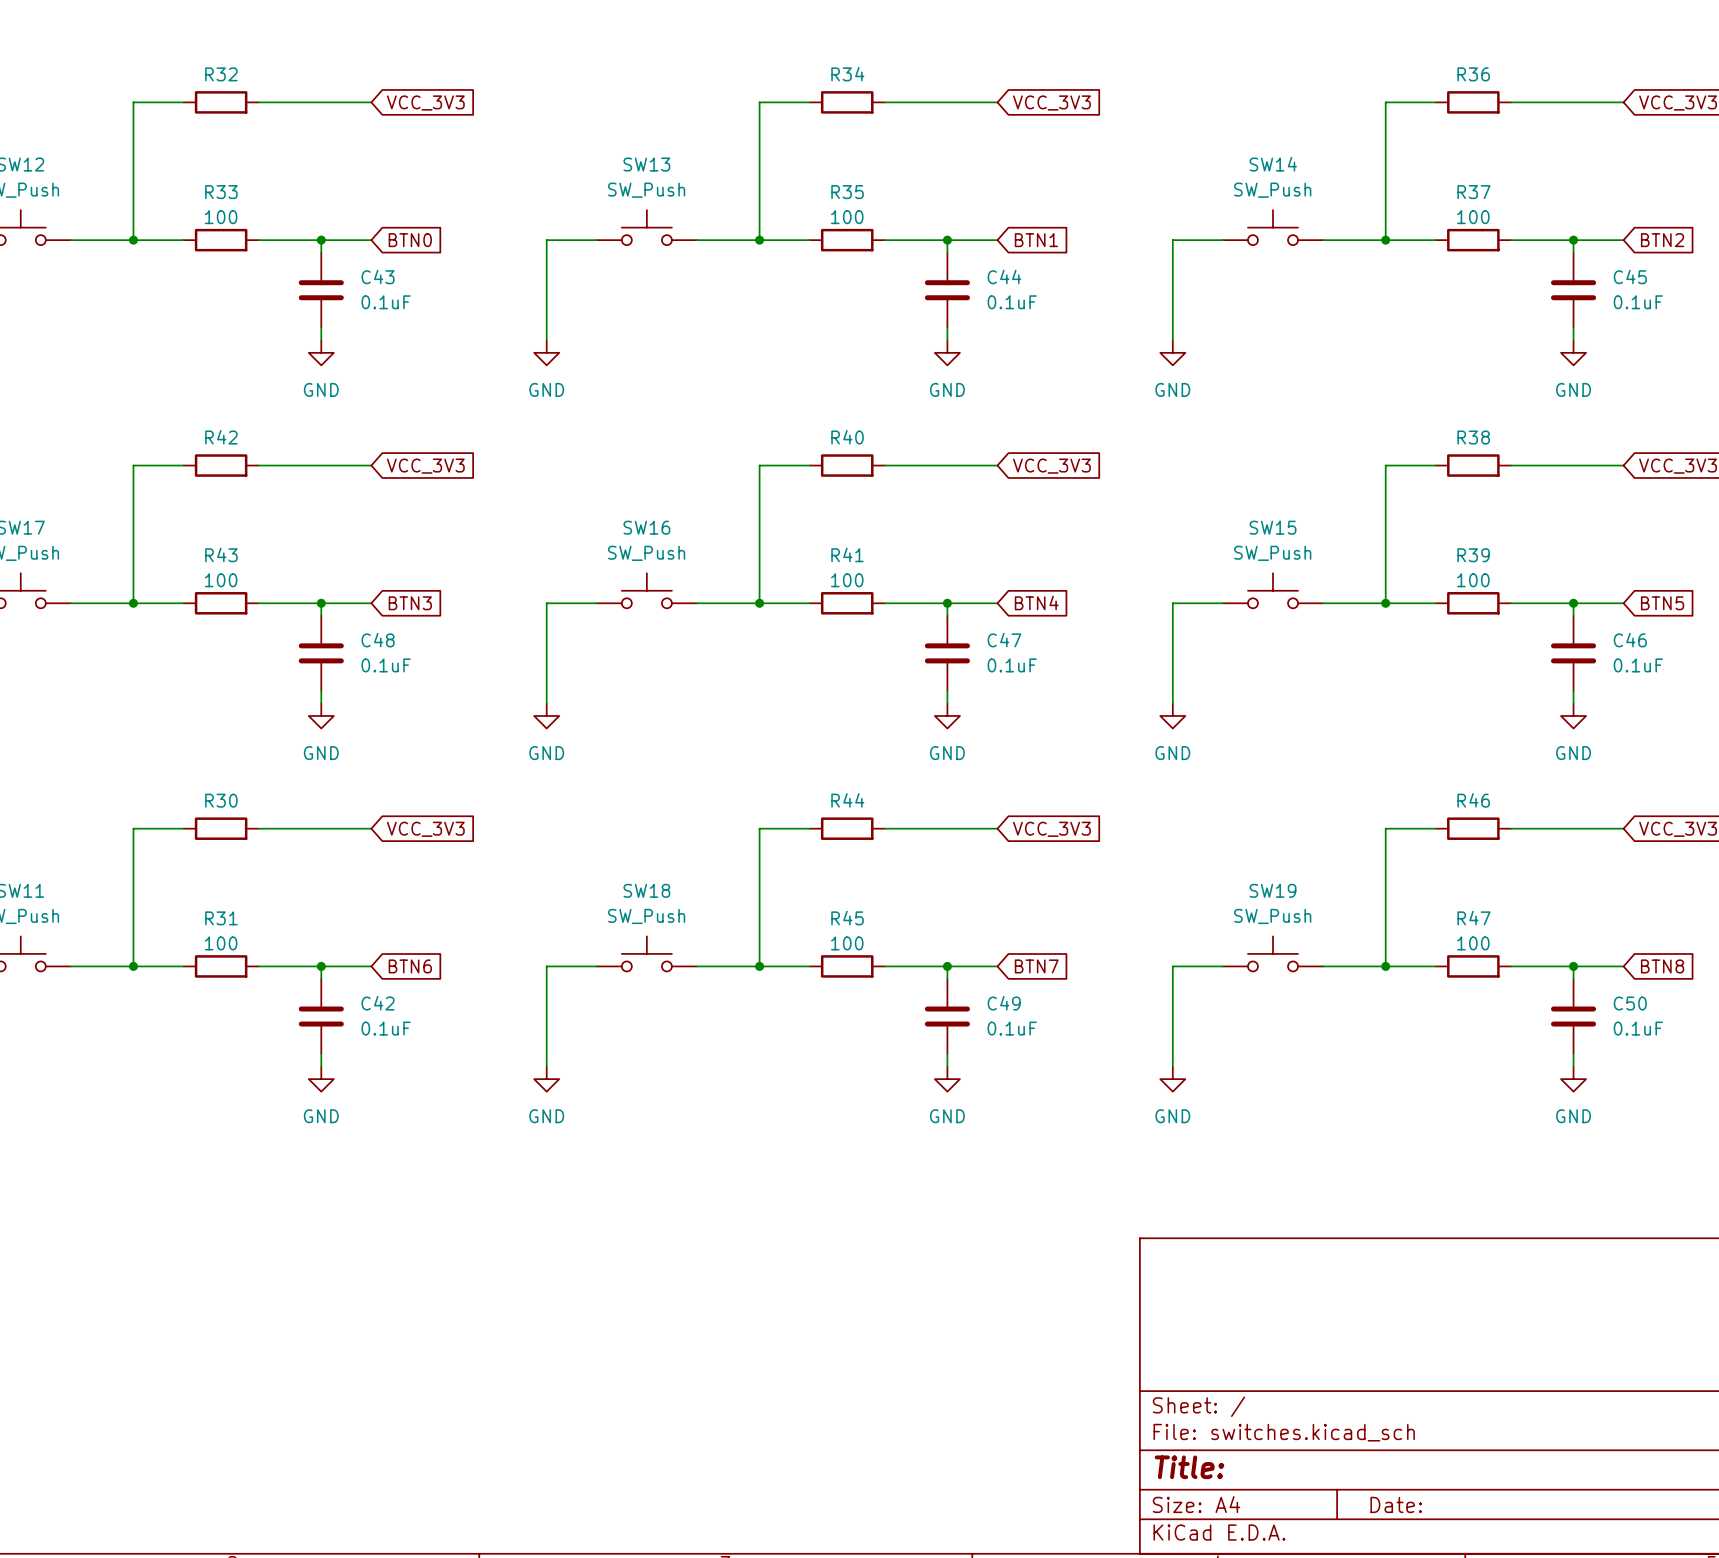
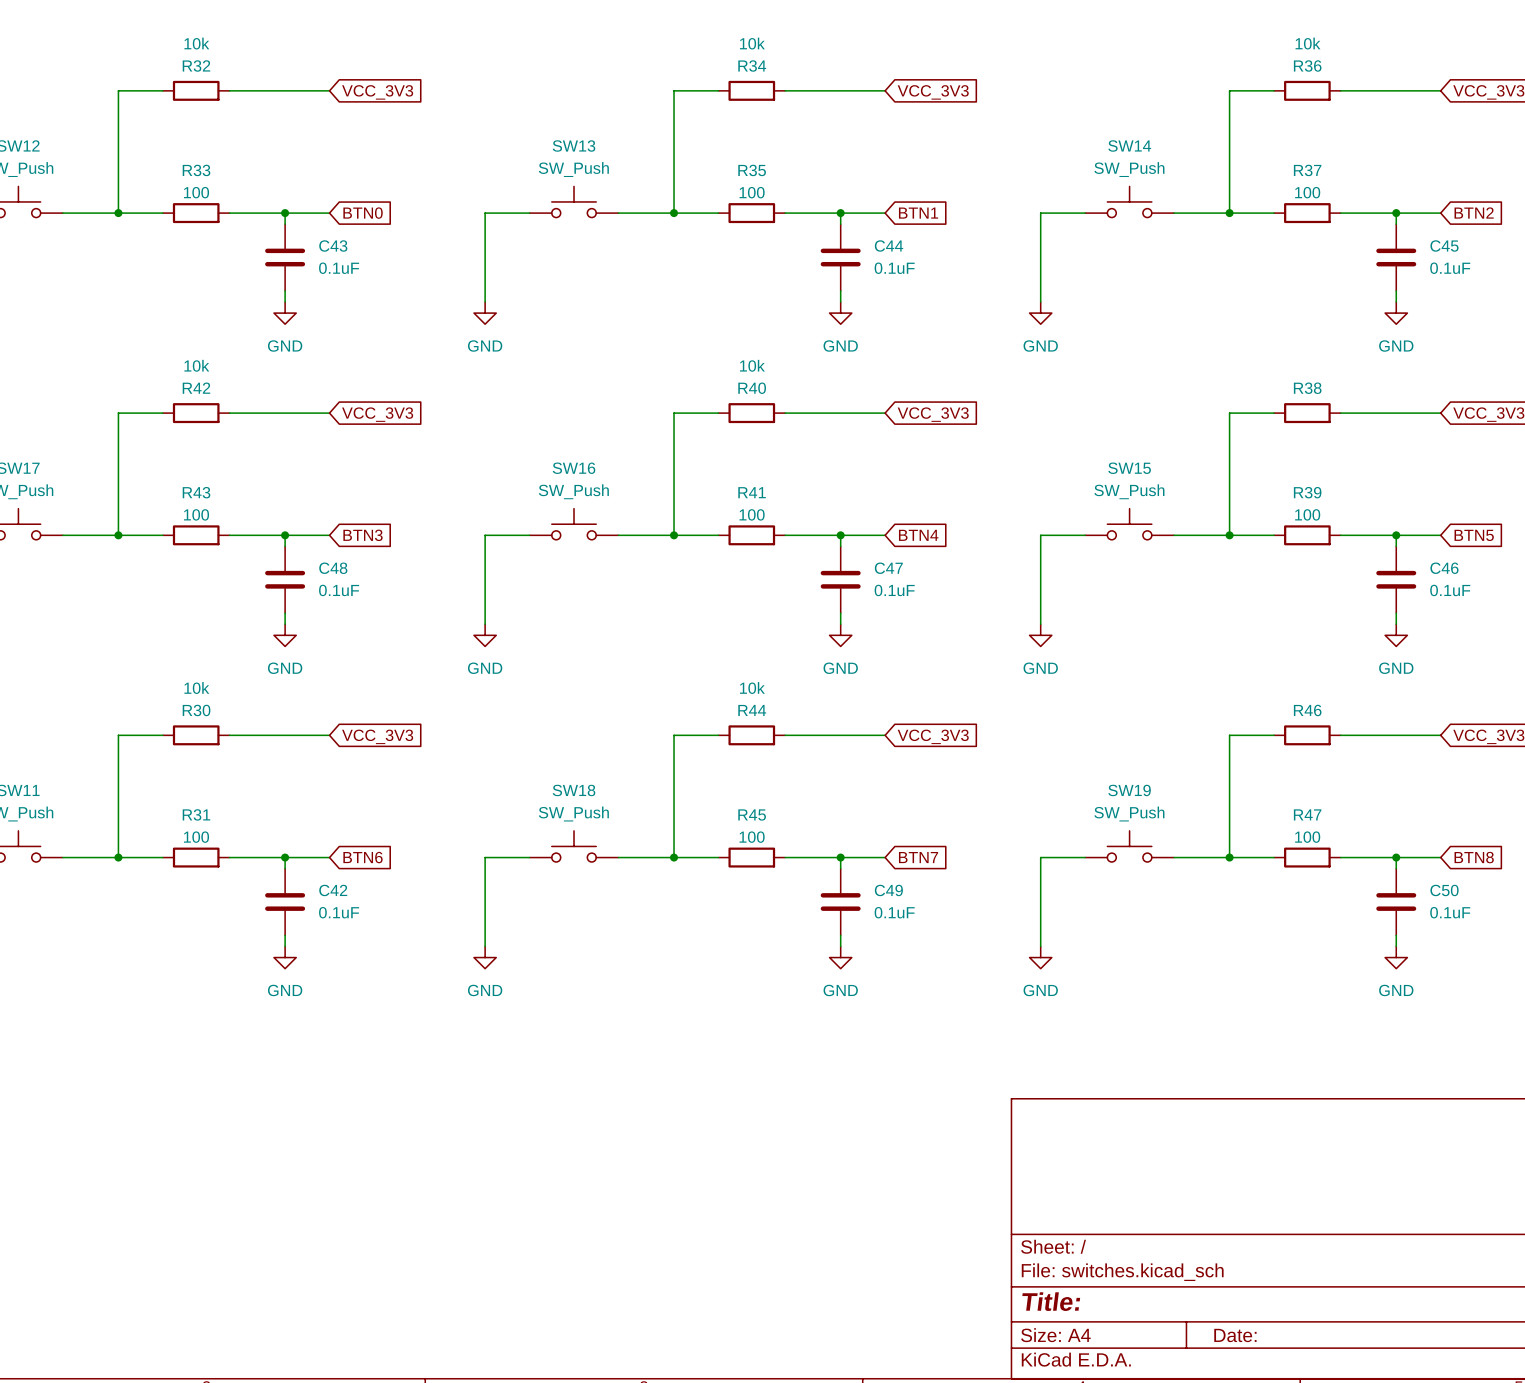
R32 value: none -> 10k (196, 43)
R34 value: none -> 10k (752, 43)
R36 value: none -> 10k (1308, 43)
R42 value: none -> 10k (196, 365)
R40 value: none -> 10k (752, 365)
R30 value: none -> 10k (196, 688)
R44 value: none -> 10k (752, 688)

